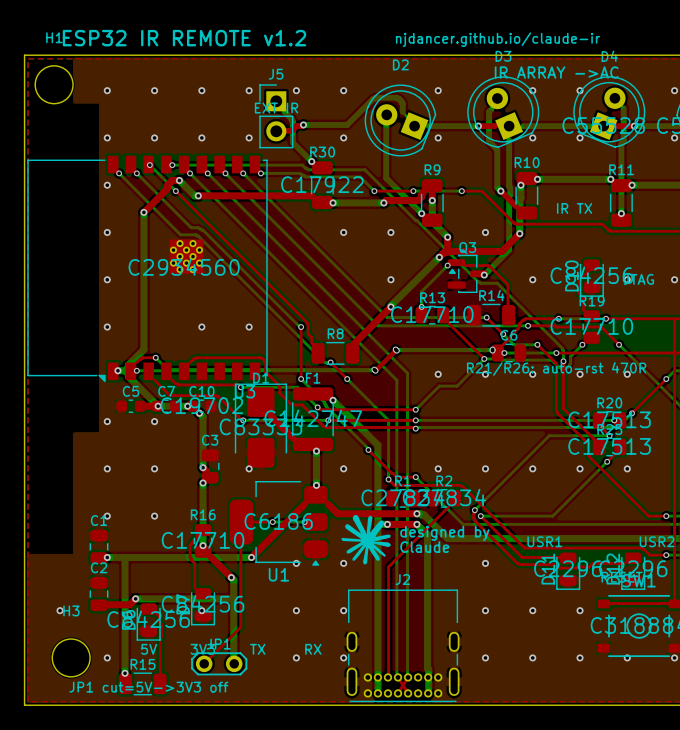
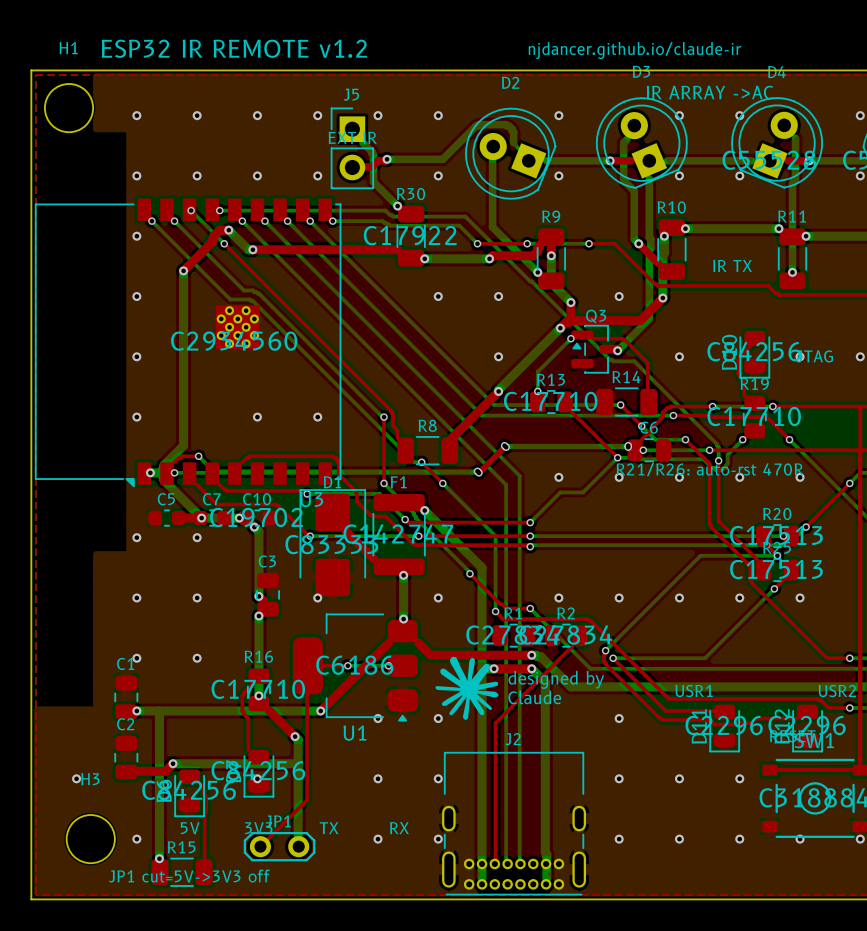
top track: (398, 677) (408, 693) -> none
top track: (408, 677) (398, 693) -> none

